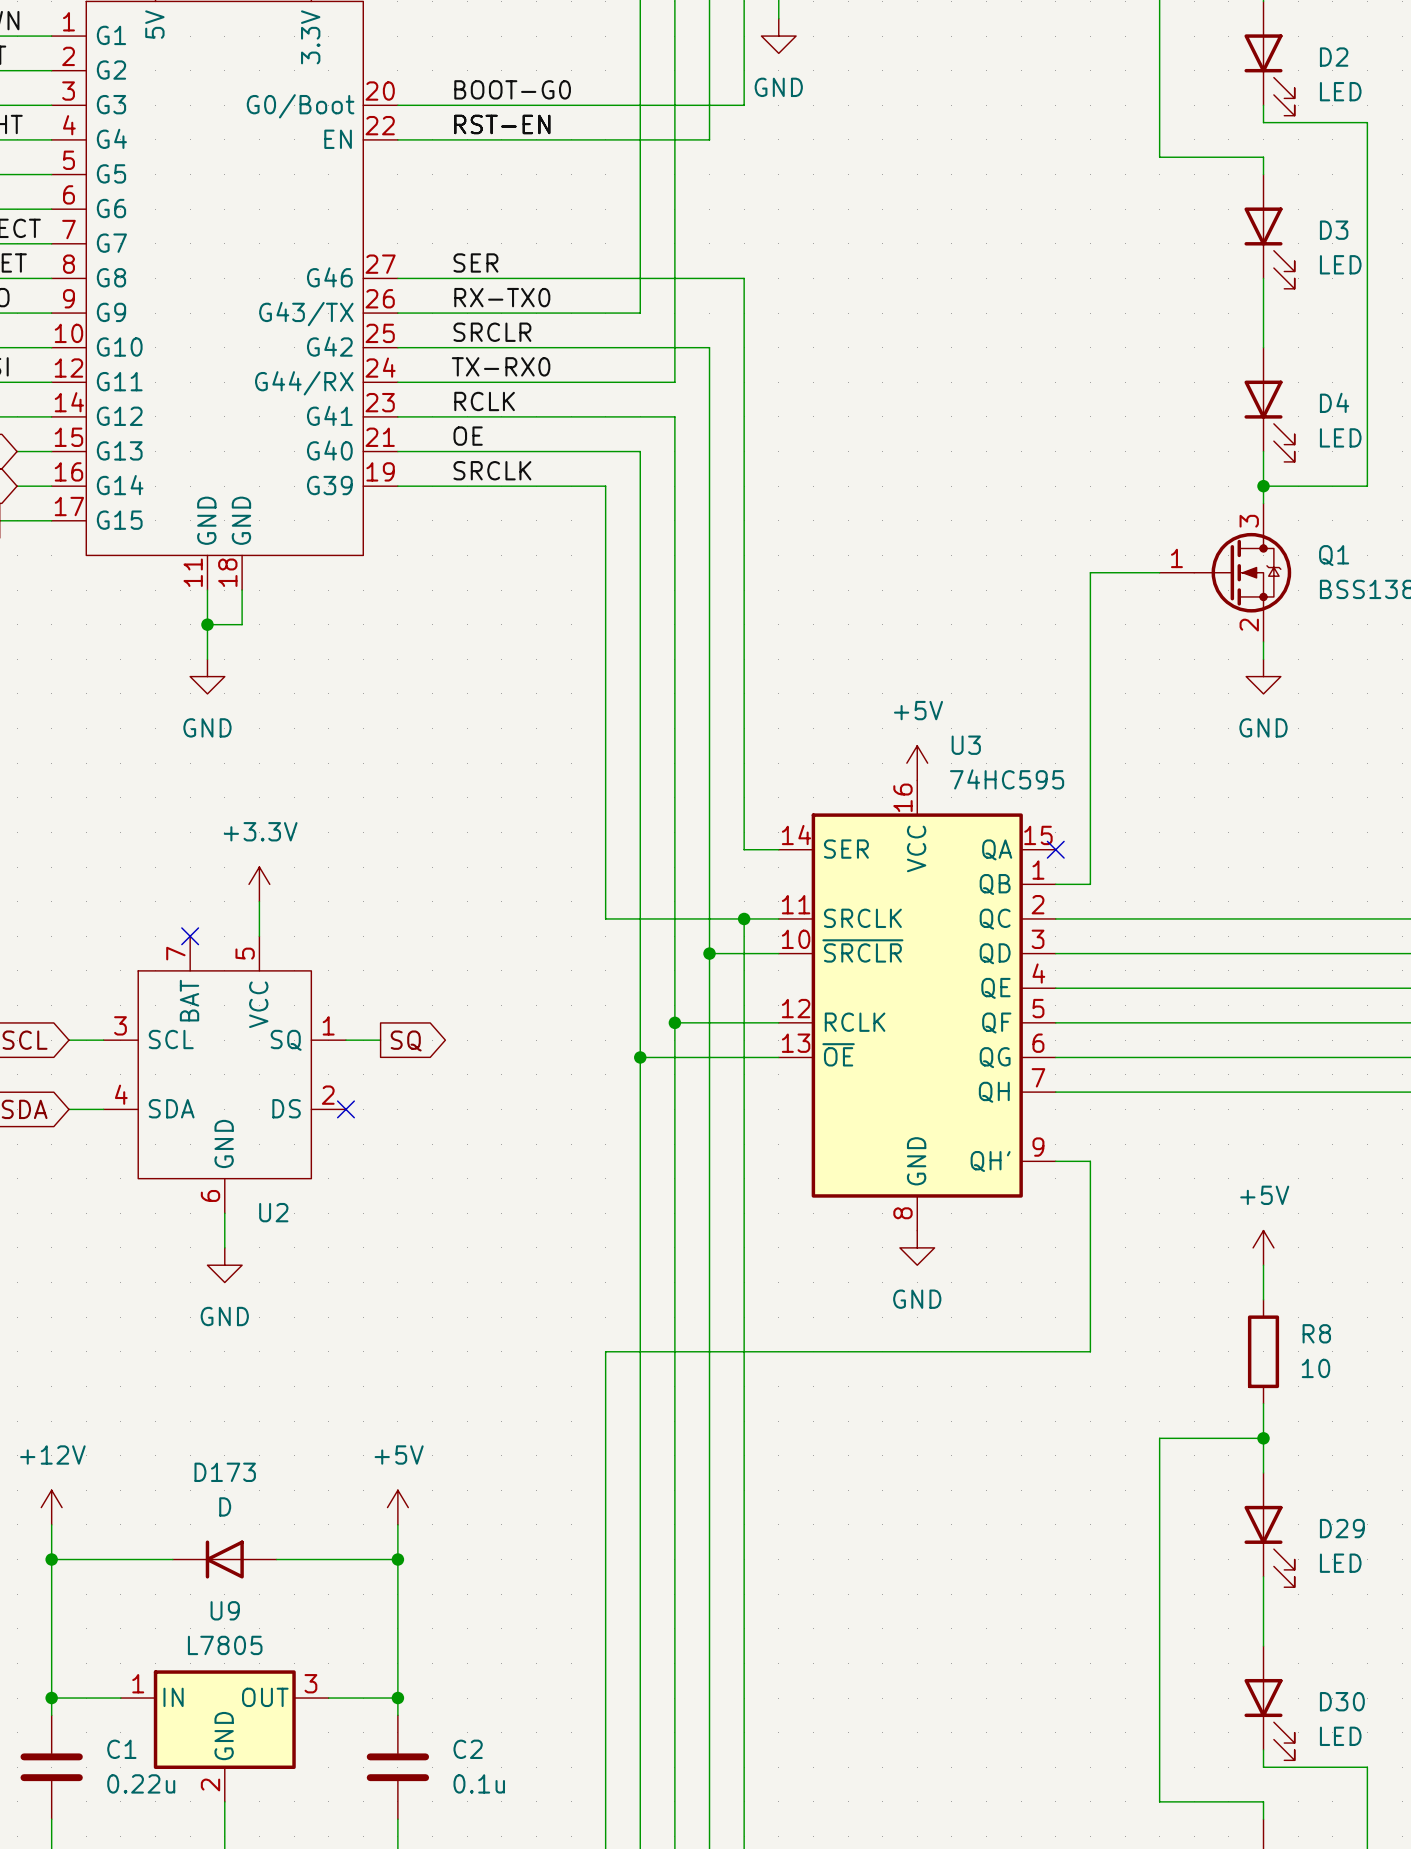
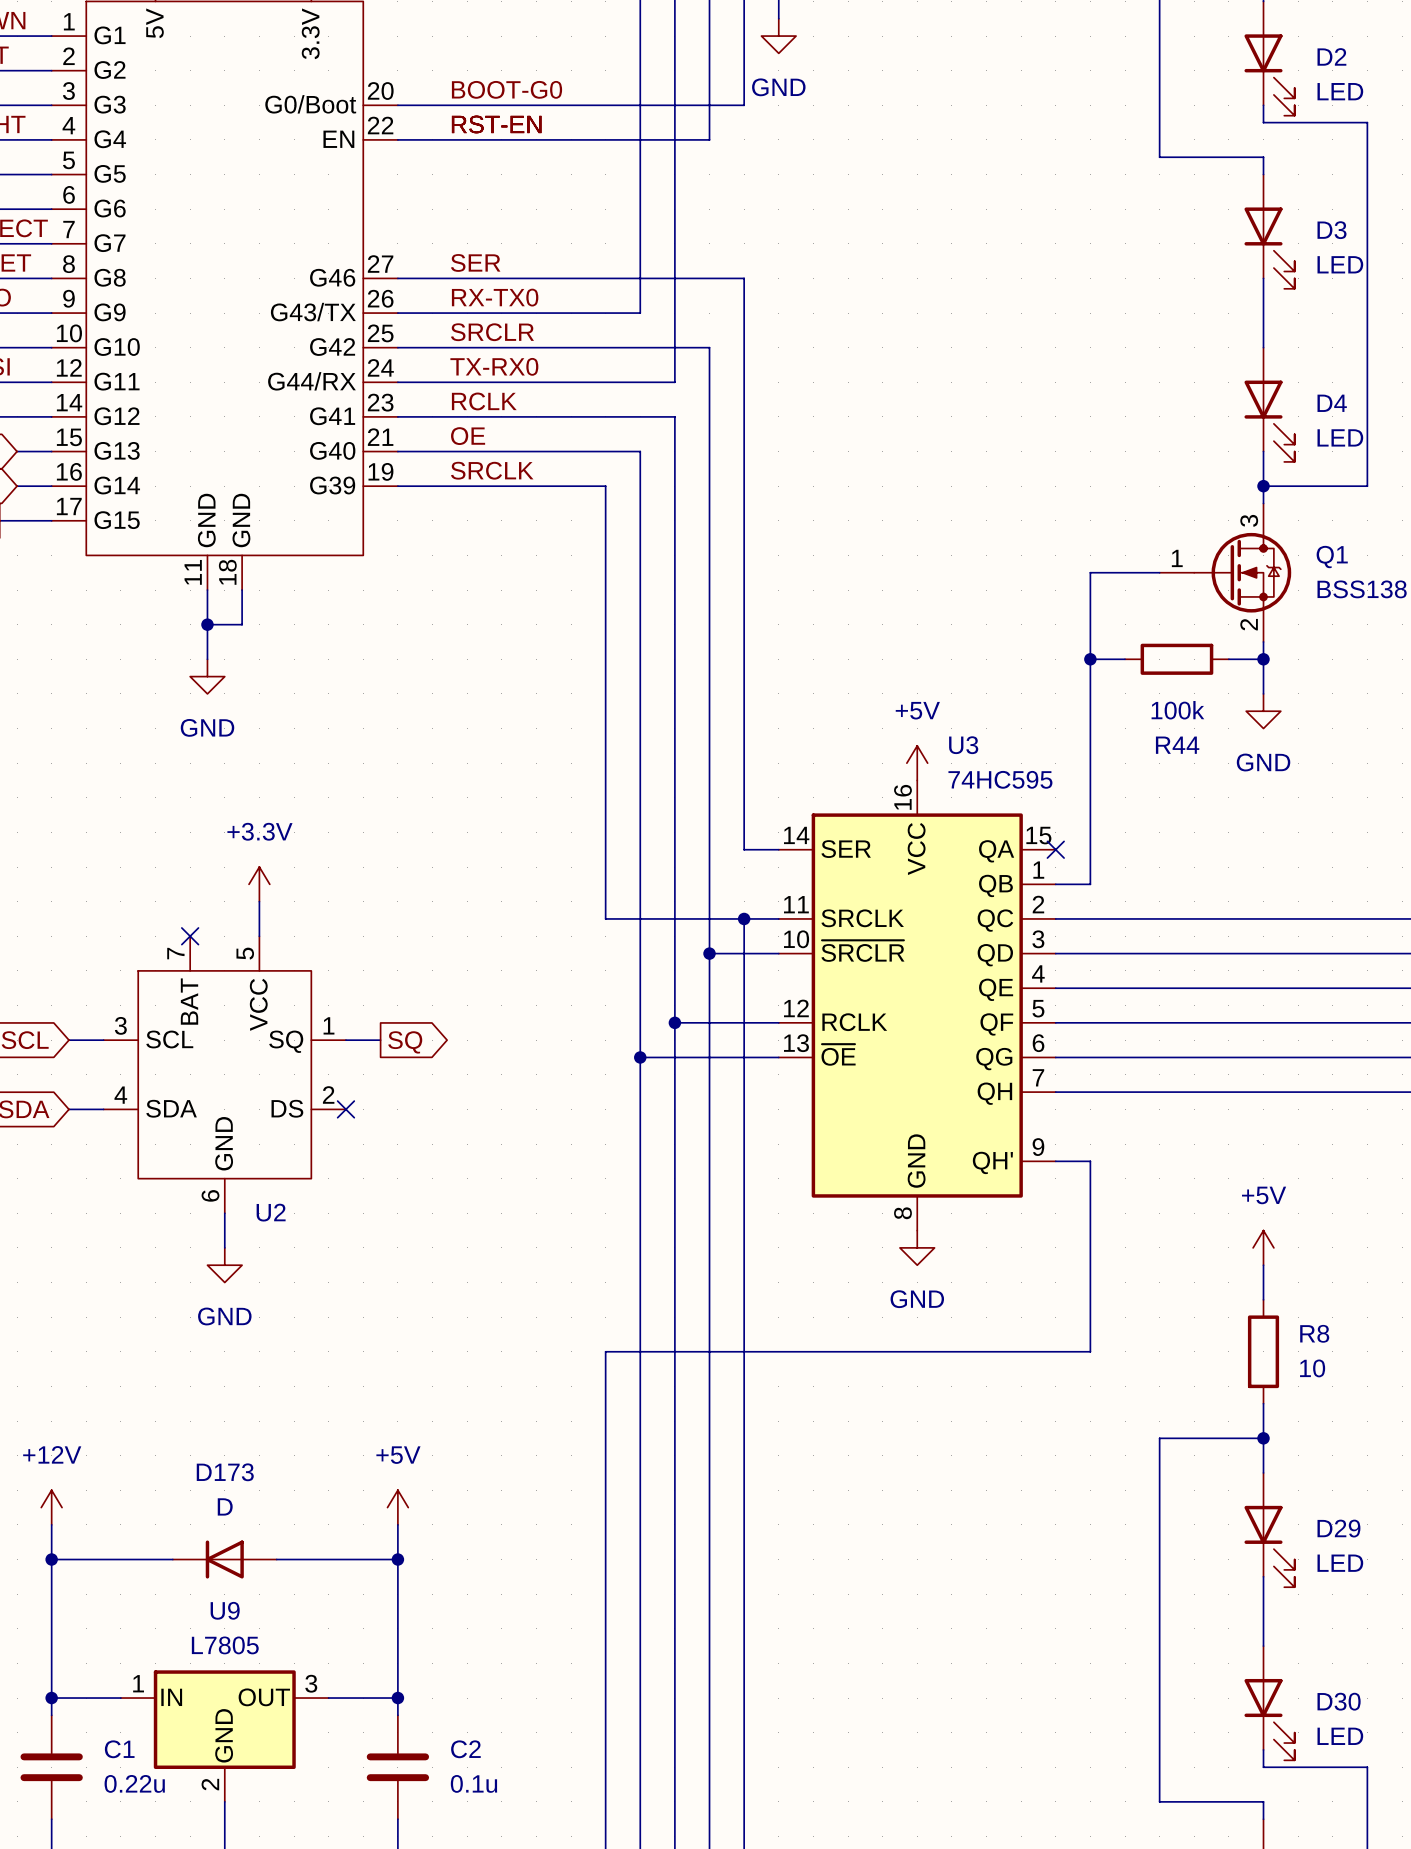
wire: none -> (1090, 659) (1125, 659)
junction: none -> (1090, 659)
R44: none -> 100k (1176, 659)
wire: none -> (1228, 659) (1263, 659) (1263, 693)
junction: none -> (1263, 659)
power symbol position: GND (1263, 676) -> GND (1263, 711)

